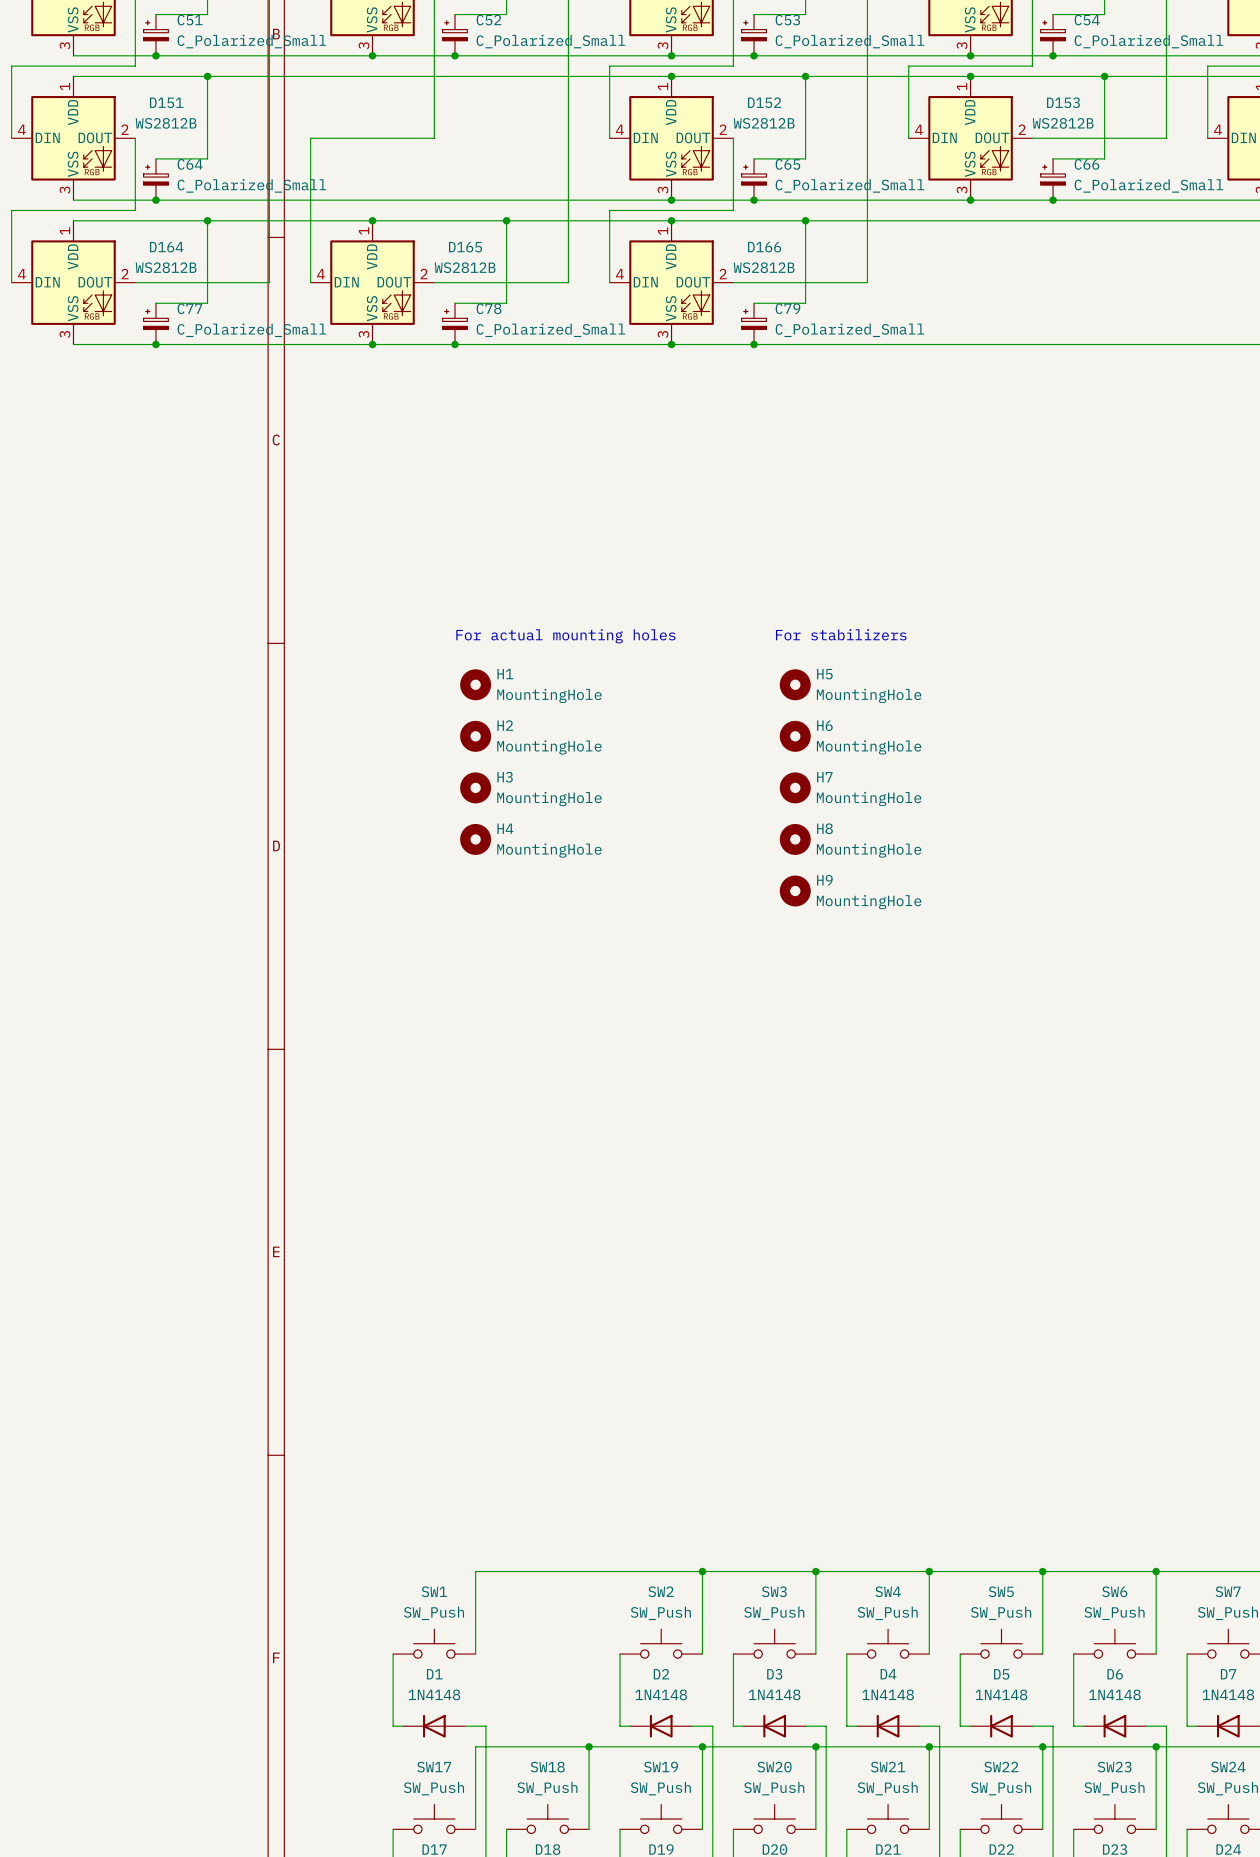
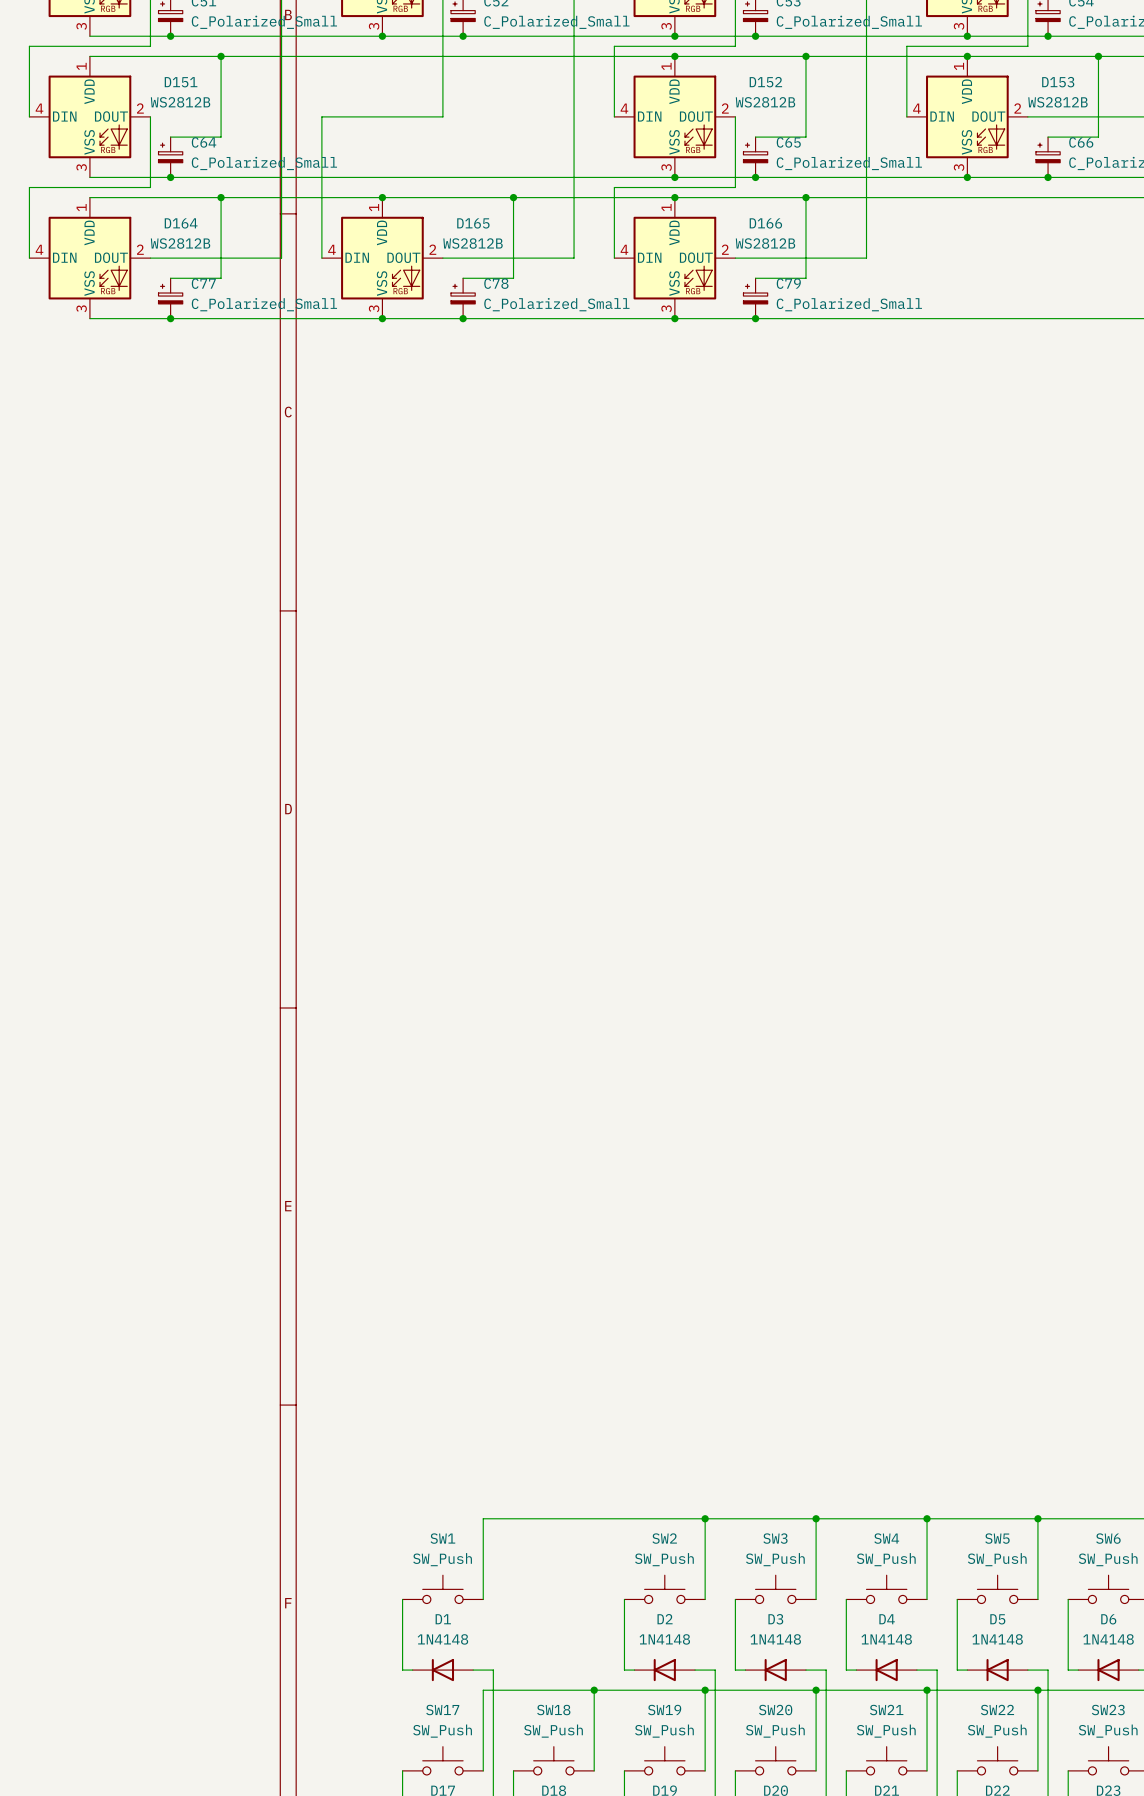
text: For stabilizers (841, 634) -> none
text: For actual mounting holes (565, 636) -> none
H1: MountingHole (475, 684) -> none
H5: MountingHole (795, 684) -> none
H2: MountingHole (475, 736) -> none
H6: MountingHole (795, 736) -> none
H3: MountingHole (475, 787) -> none
H7: MountingHole (795, 787) -> none
H4: MountingHole (475, 839) -> none
H8: MountingHole (795, 839) -> none
H9: MountingHole (795, 891) -> none

